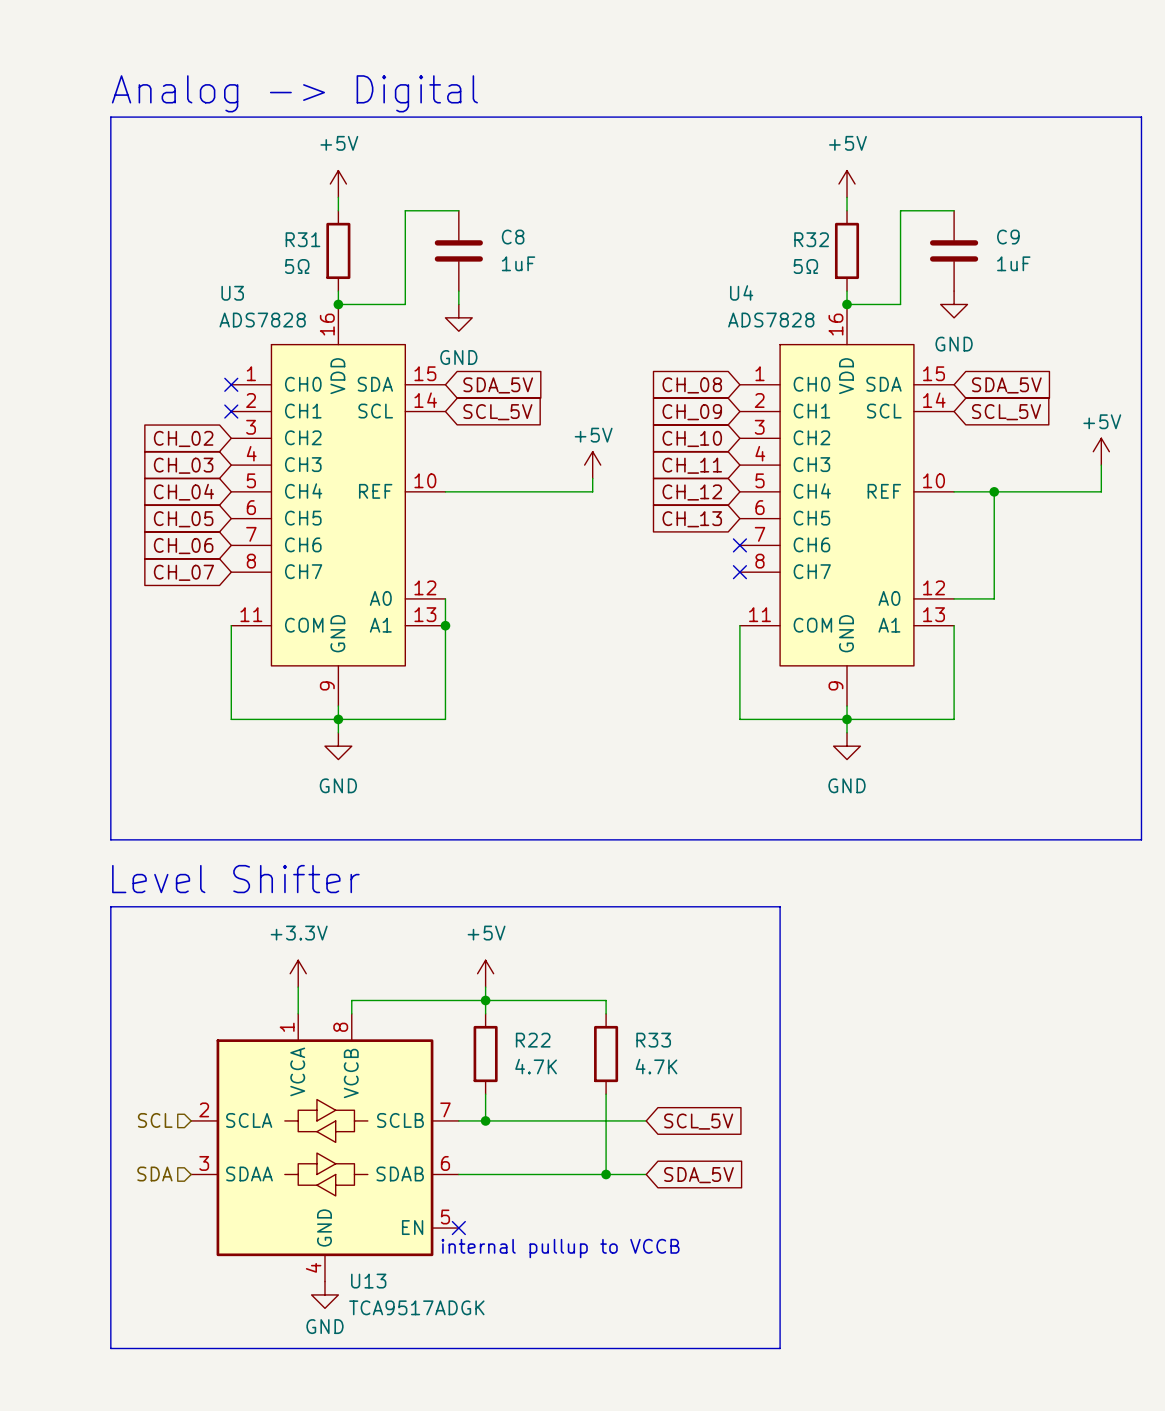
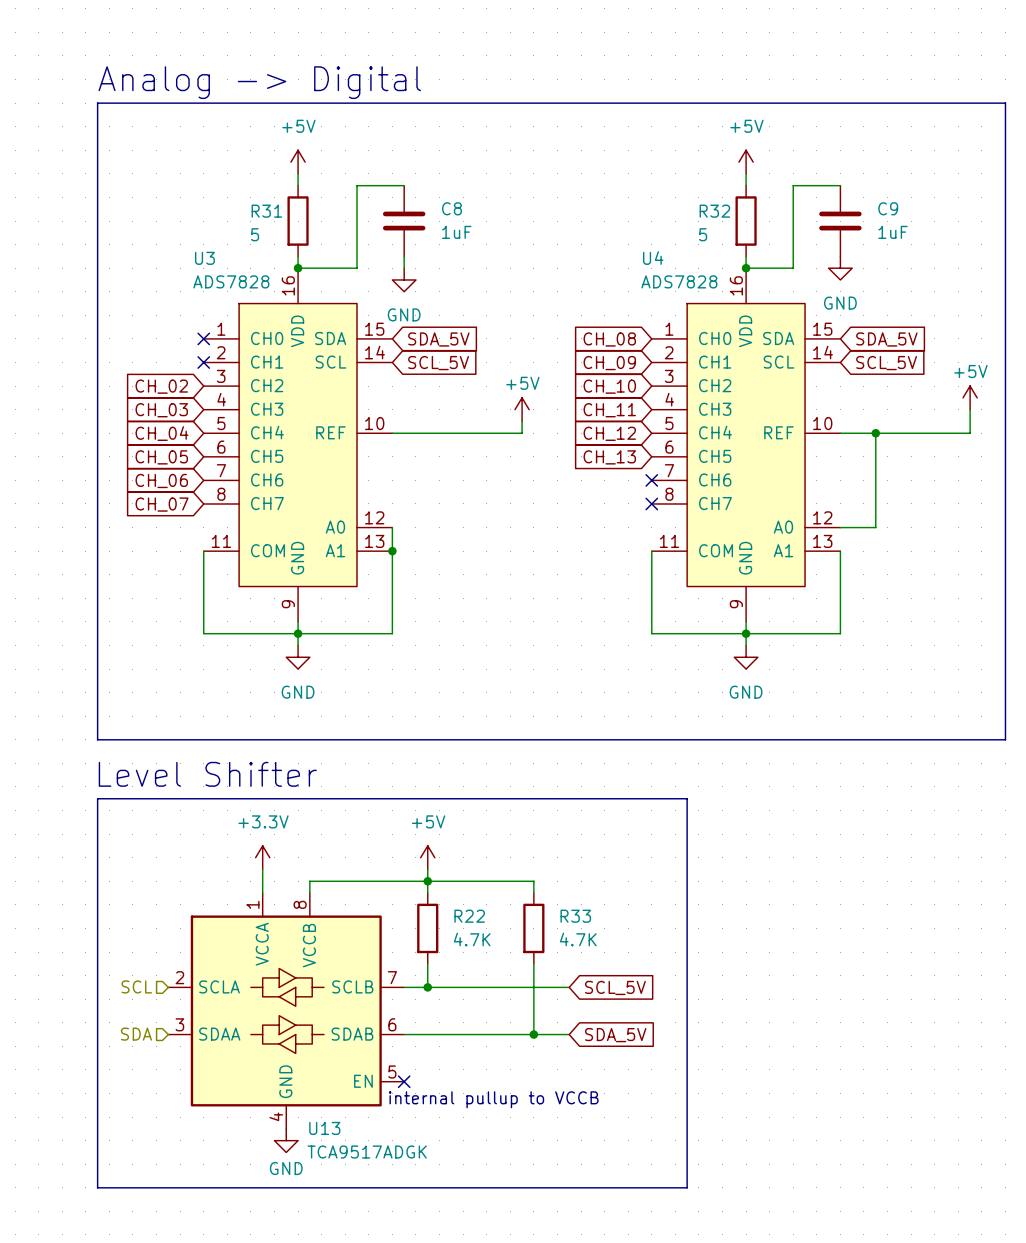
R31 value: 5Ω (297, 266) -> 5 (255, 234)
R32 value: 5Ω (805, 266) -> 5 (703, 234)

